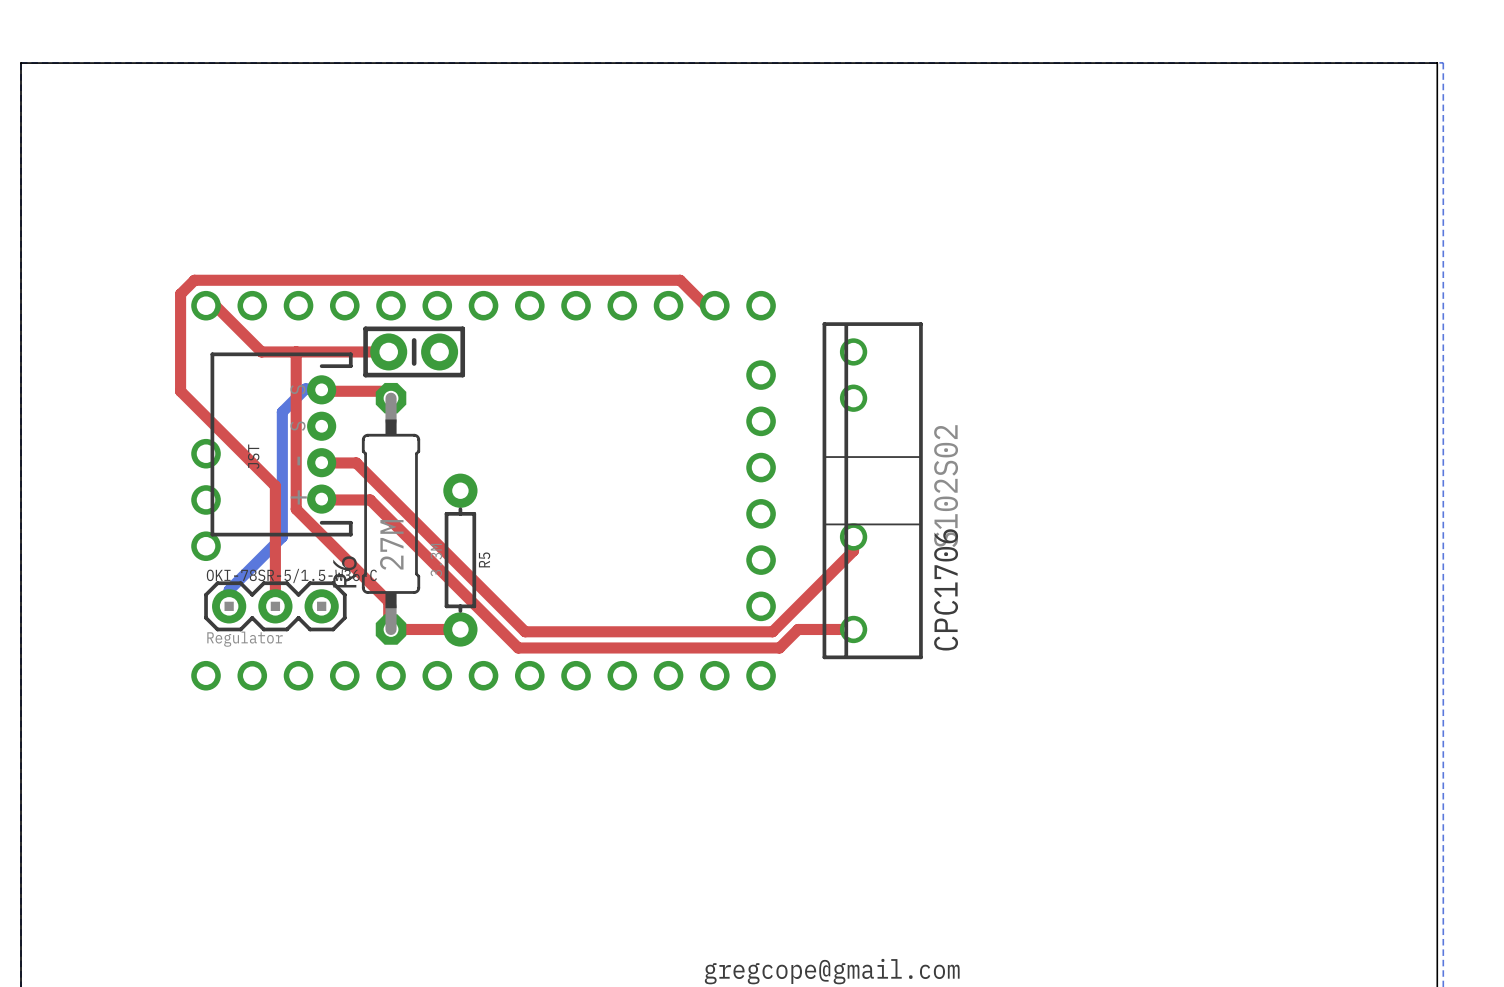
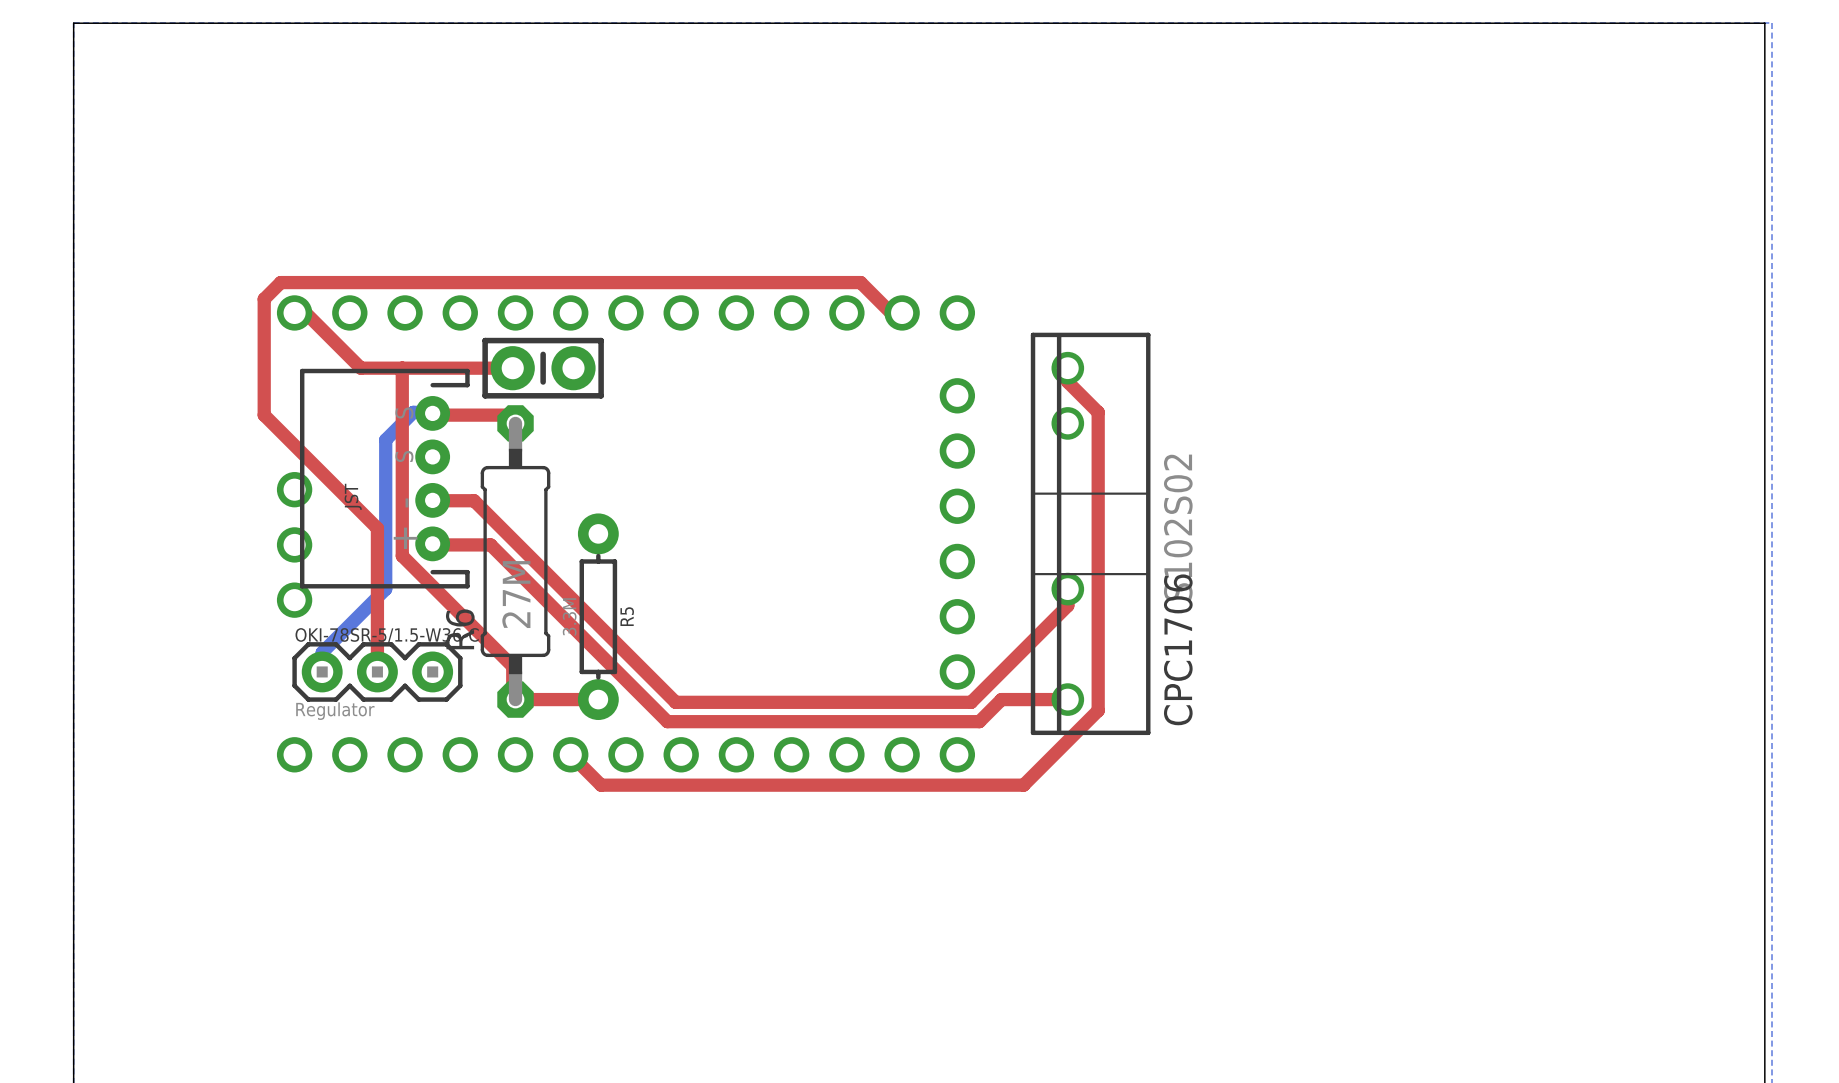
top track: none -> (1067, 368) (1067, 381) (1098, 412) (1098, 710) (1023, 785) (601, 785) (570, 754)

